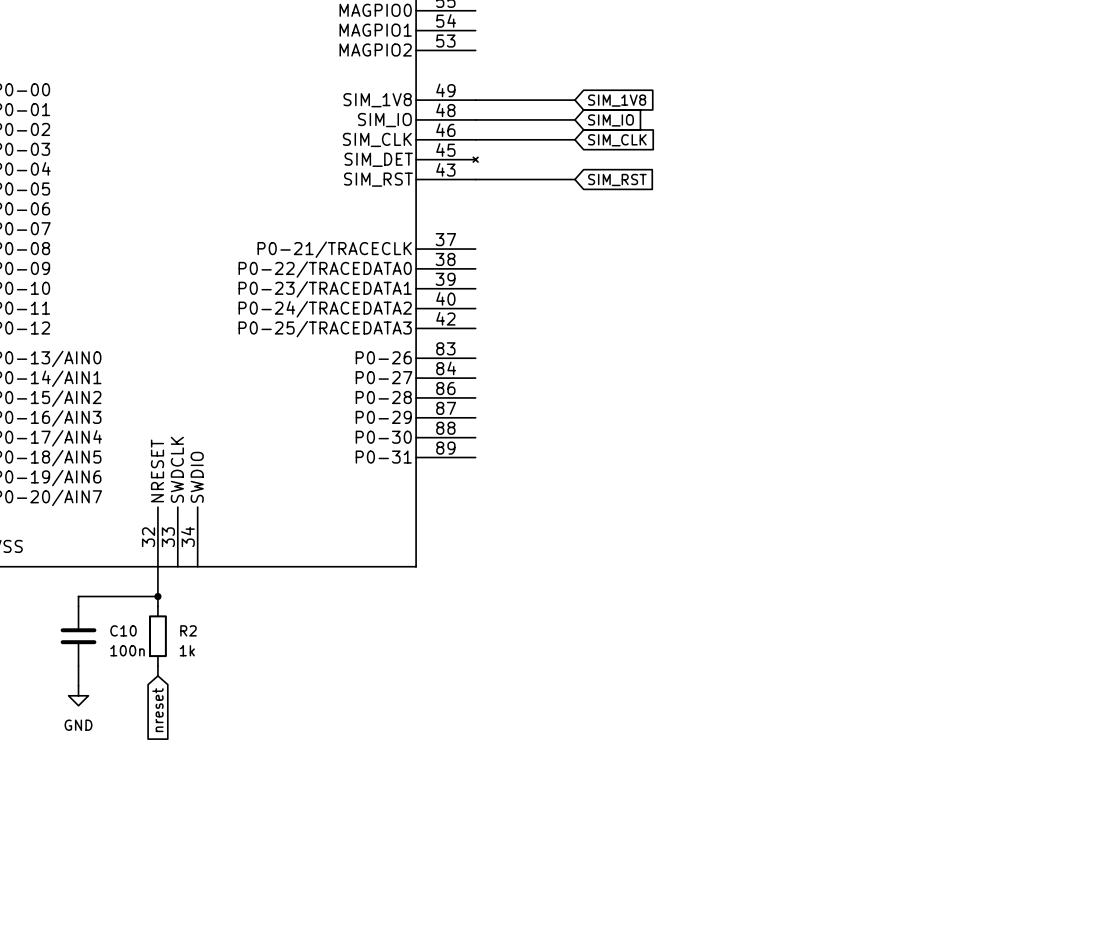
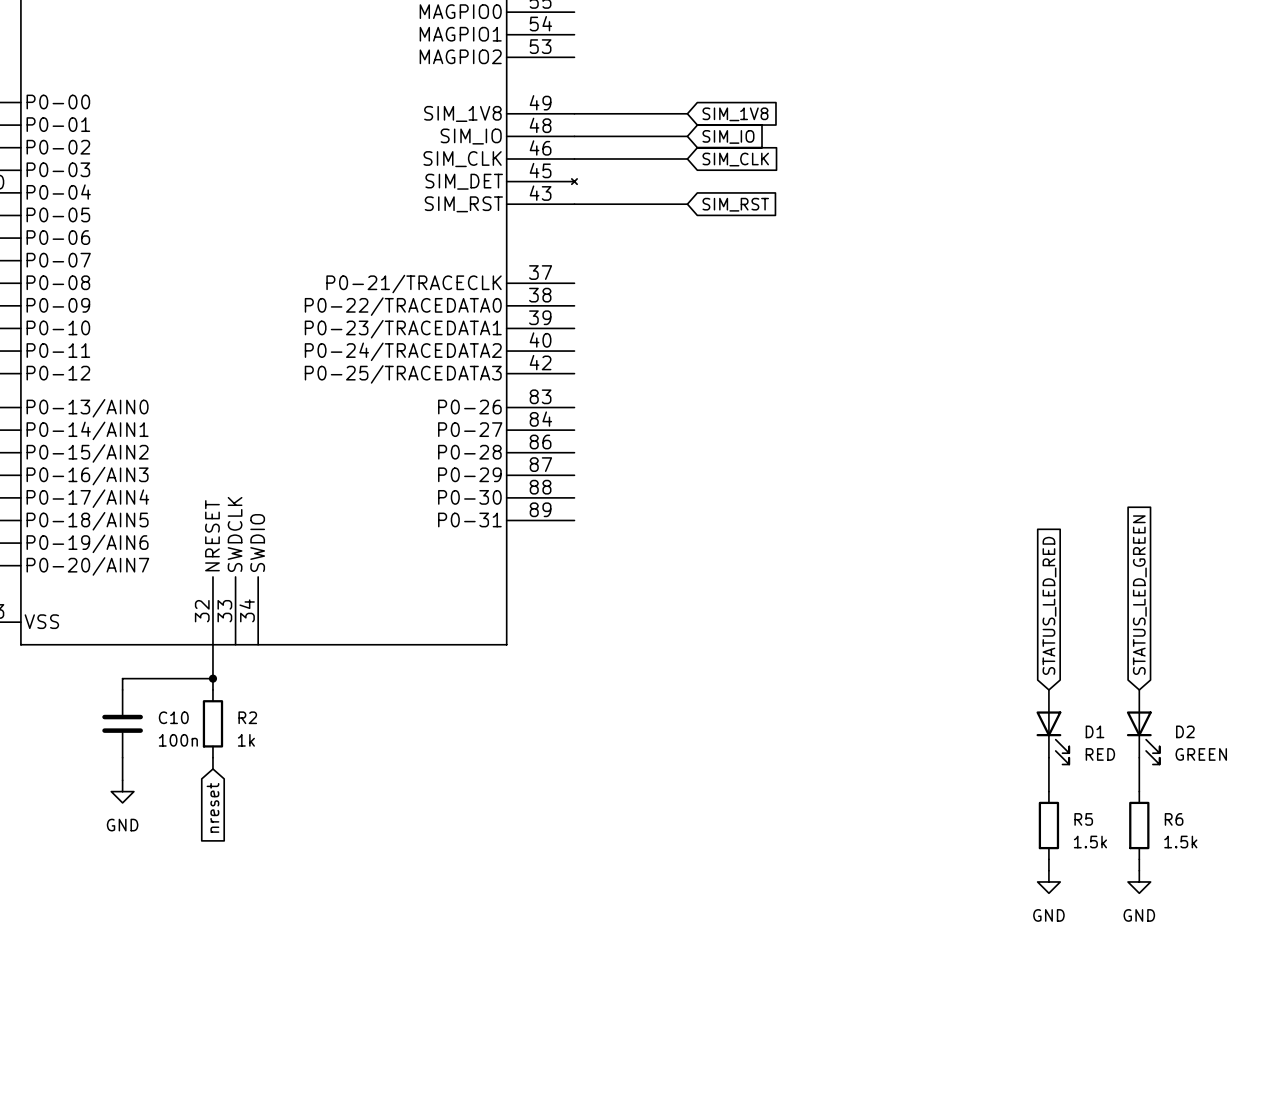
global label: none -> STATUS_LED_GREEN (1139, 595)
global label: none -> STATUS_LED_RED (1049, 605)
D1: none -> RED (1052, 727)
D2: none -> GREEN (1143, 727)
wire: none -> (1048, 757) (1048, 791)
wire: none -> (1139, 757) (1139, 791)
R5: none -> 1.5k (1048, 825)
R6: none -> 1.5k (1139, 825)
wire: none -> (1048, 859) (1048, 870)
wire: none -> (1139, 859) (1139, 870)
power symbol: none -> GND (1048, 881)
power symbol: none -> GND (1139, 881)

